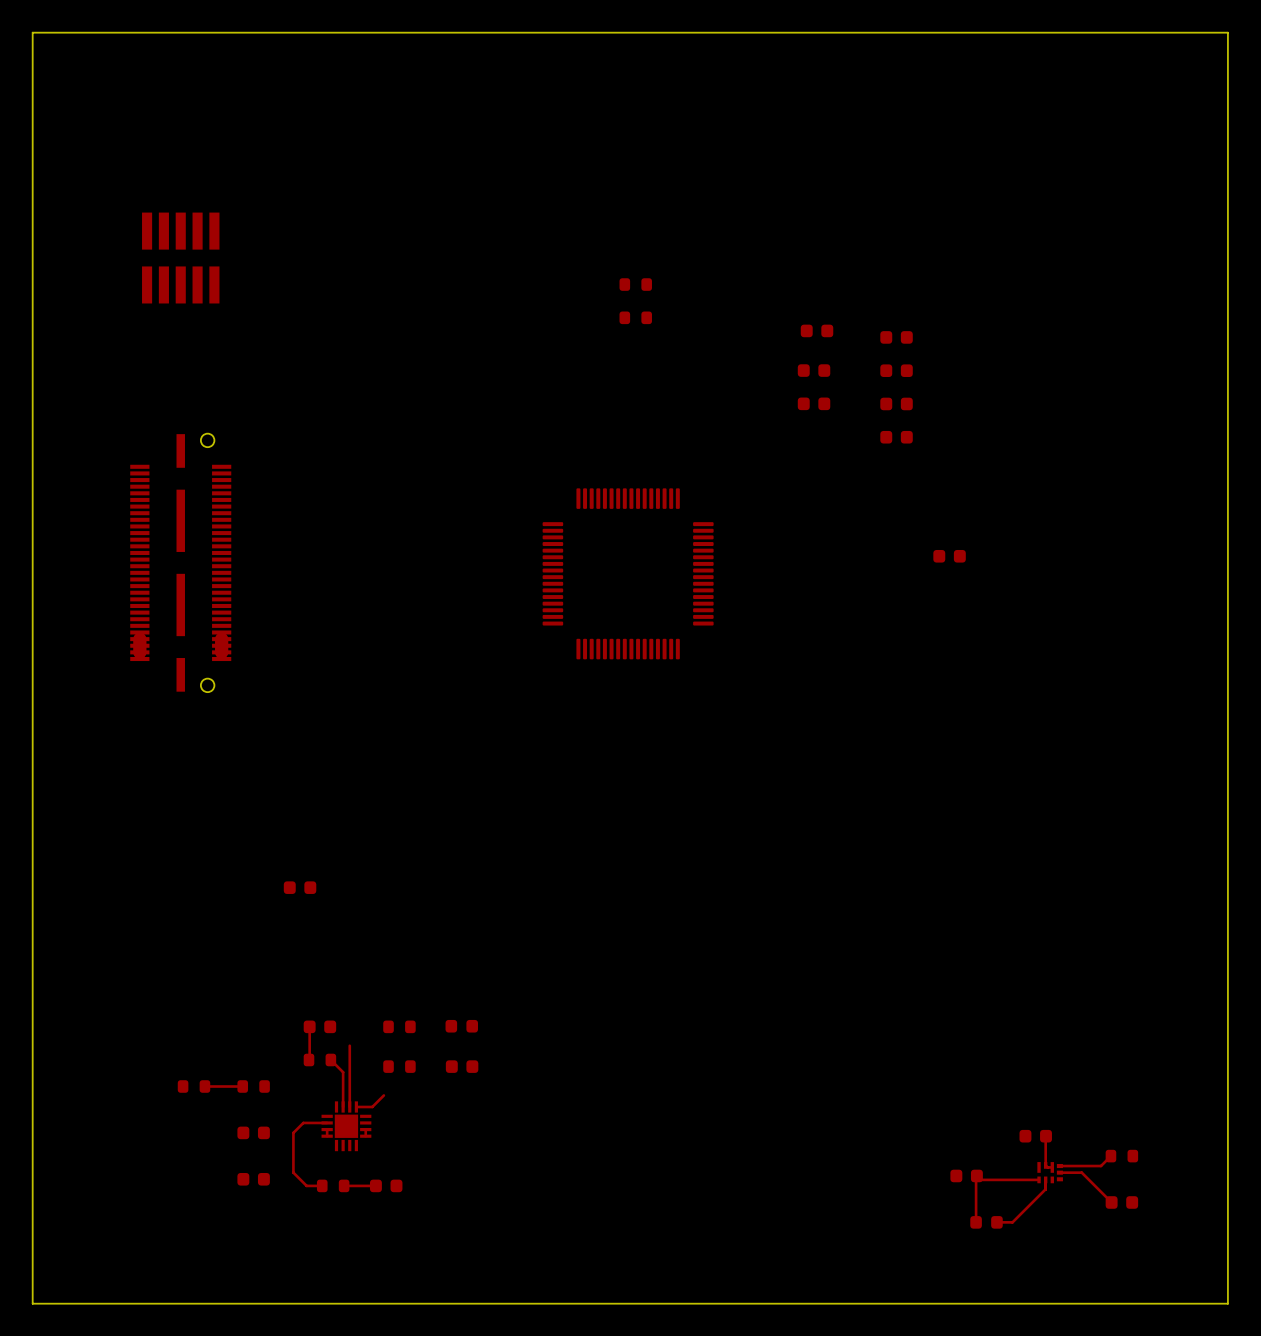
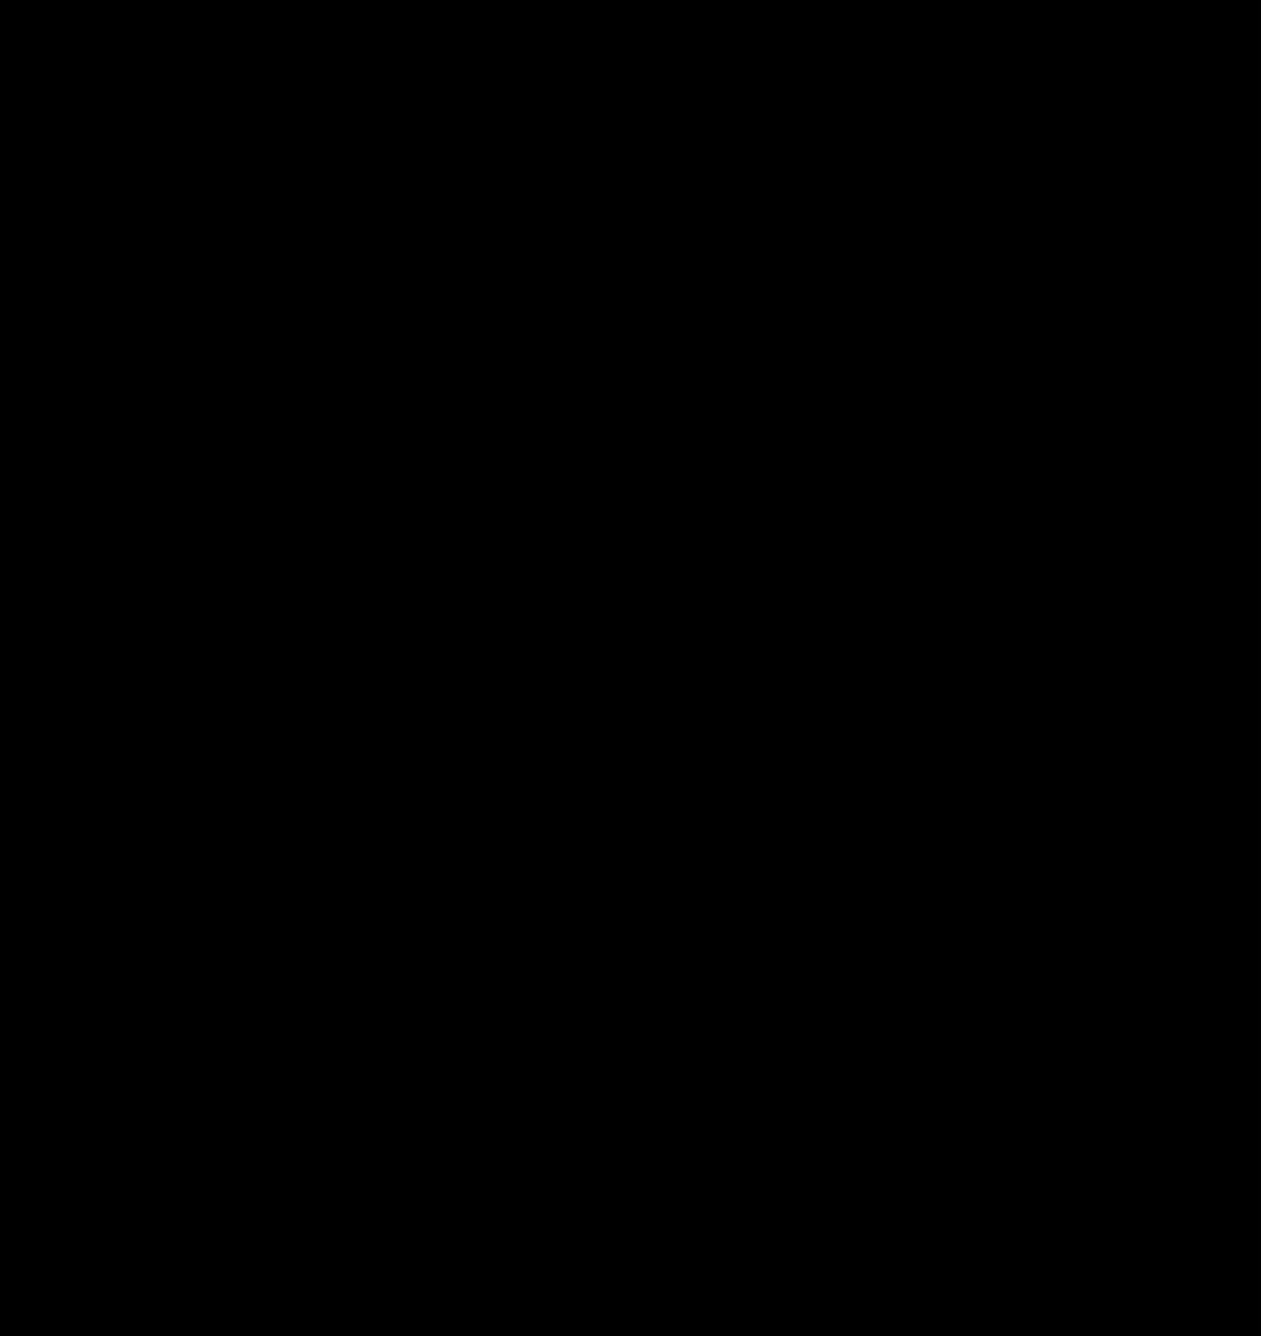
board edge: (1227, 32) (32, 32) (32, 1303) (1227, 1303) (1227, 32) -> none
part: (180, 258) -> none
part: (635, 284) -> none
part: (635, 317) -> none
part: (817, 330) -> none
part: (896, 337) -> none
part: (814, 370) -> none
part: (896, 370) -> none
part: (814, 403) -> none
part: (896, 403) -> none
part: (896, 437) -> none
part: (949, 556) -> none
part: (180, 562) -> none
part: (628, 573) -> none
top track: (139, 639) (139, 652) -> none
top track: (221, 639) (221, 652) -> none
part: (300, 887) -> none
top track: (309, 1026) (308, 1059) -> none
part: (319, 1026) -> none
part: (399, 1026) -> none
part: (461, 1026) -> none
top track: (349, 1045) (349, 1106) -> none
part: (319, 1059) -> none
top track: (330, 1059) (343, 1072) (343, 1106) -> none
part: (399, 1066) -> none
part: (462, 1066) -> none
part: (194, 1086) -> none
top track: (242, 1086) (204, 1086) -> none
part: (253, 1086) -> none
top track: (383, 1095) (372, 1106) (356, 1106) -> none
top track: (327, 1122) (303, 1122) (293, 1132) (293, 1172) (306, 1185) (322, 1185) -> none
part: (346, 1126) -> none
top track: (327, 1129) (327, 1136) -> none
top track: (365, 1129) (365, 1136) -> none
part: (253, 1132) -> none
part: (1035, 1136) -> none
top track: (1046, 1136) (1045, 1165) (1052, 1167) -> none
top track: (1110, 1156) (1101, 1166) (1059, 1166) -> none
part: (1121, 1156) -> none
part: (1050, 1172) -> none
top track: (1059, 1172) (1081, 1172) (1111, 1202) -> none
part: (966, 1175) -> none
part: (253, 1179) -> none
top track: (1039, 1179) (980, 1179) (976, 1175) (976, 1222) -> none
top track: (1045, 1179) (1045, 1189) -> none
part: (333, 1185) -> none
top track: (375, 1185) (344, 1185) -> none
part: (386, 1185) -> none
top track: (1045, 1189) (1012, 1222) (996, 1222) -> none
part: (1121, 1202) -> none
part: (986, 1222) -> none

